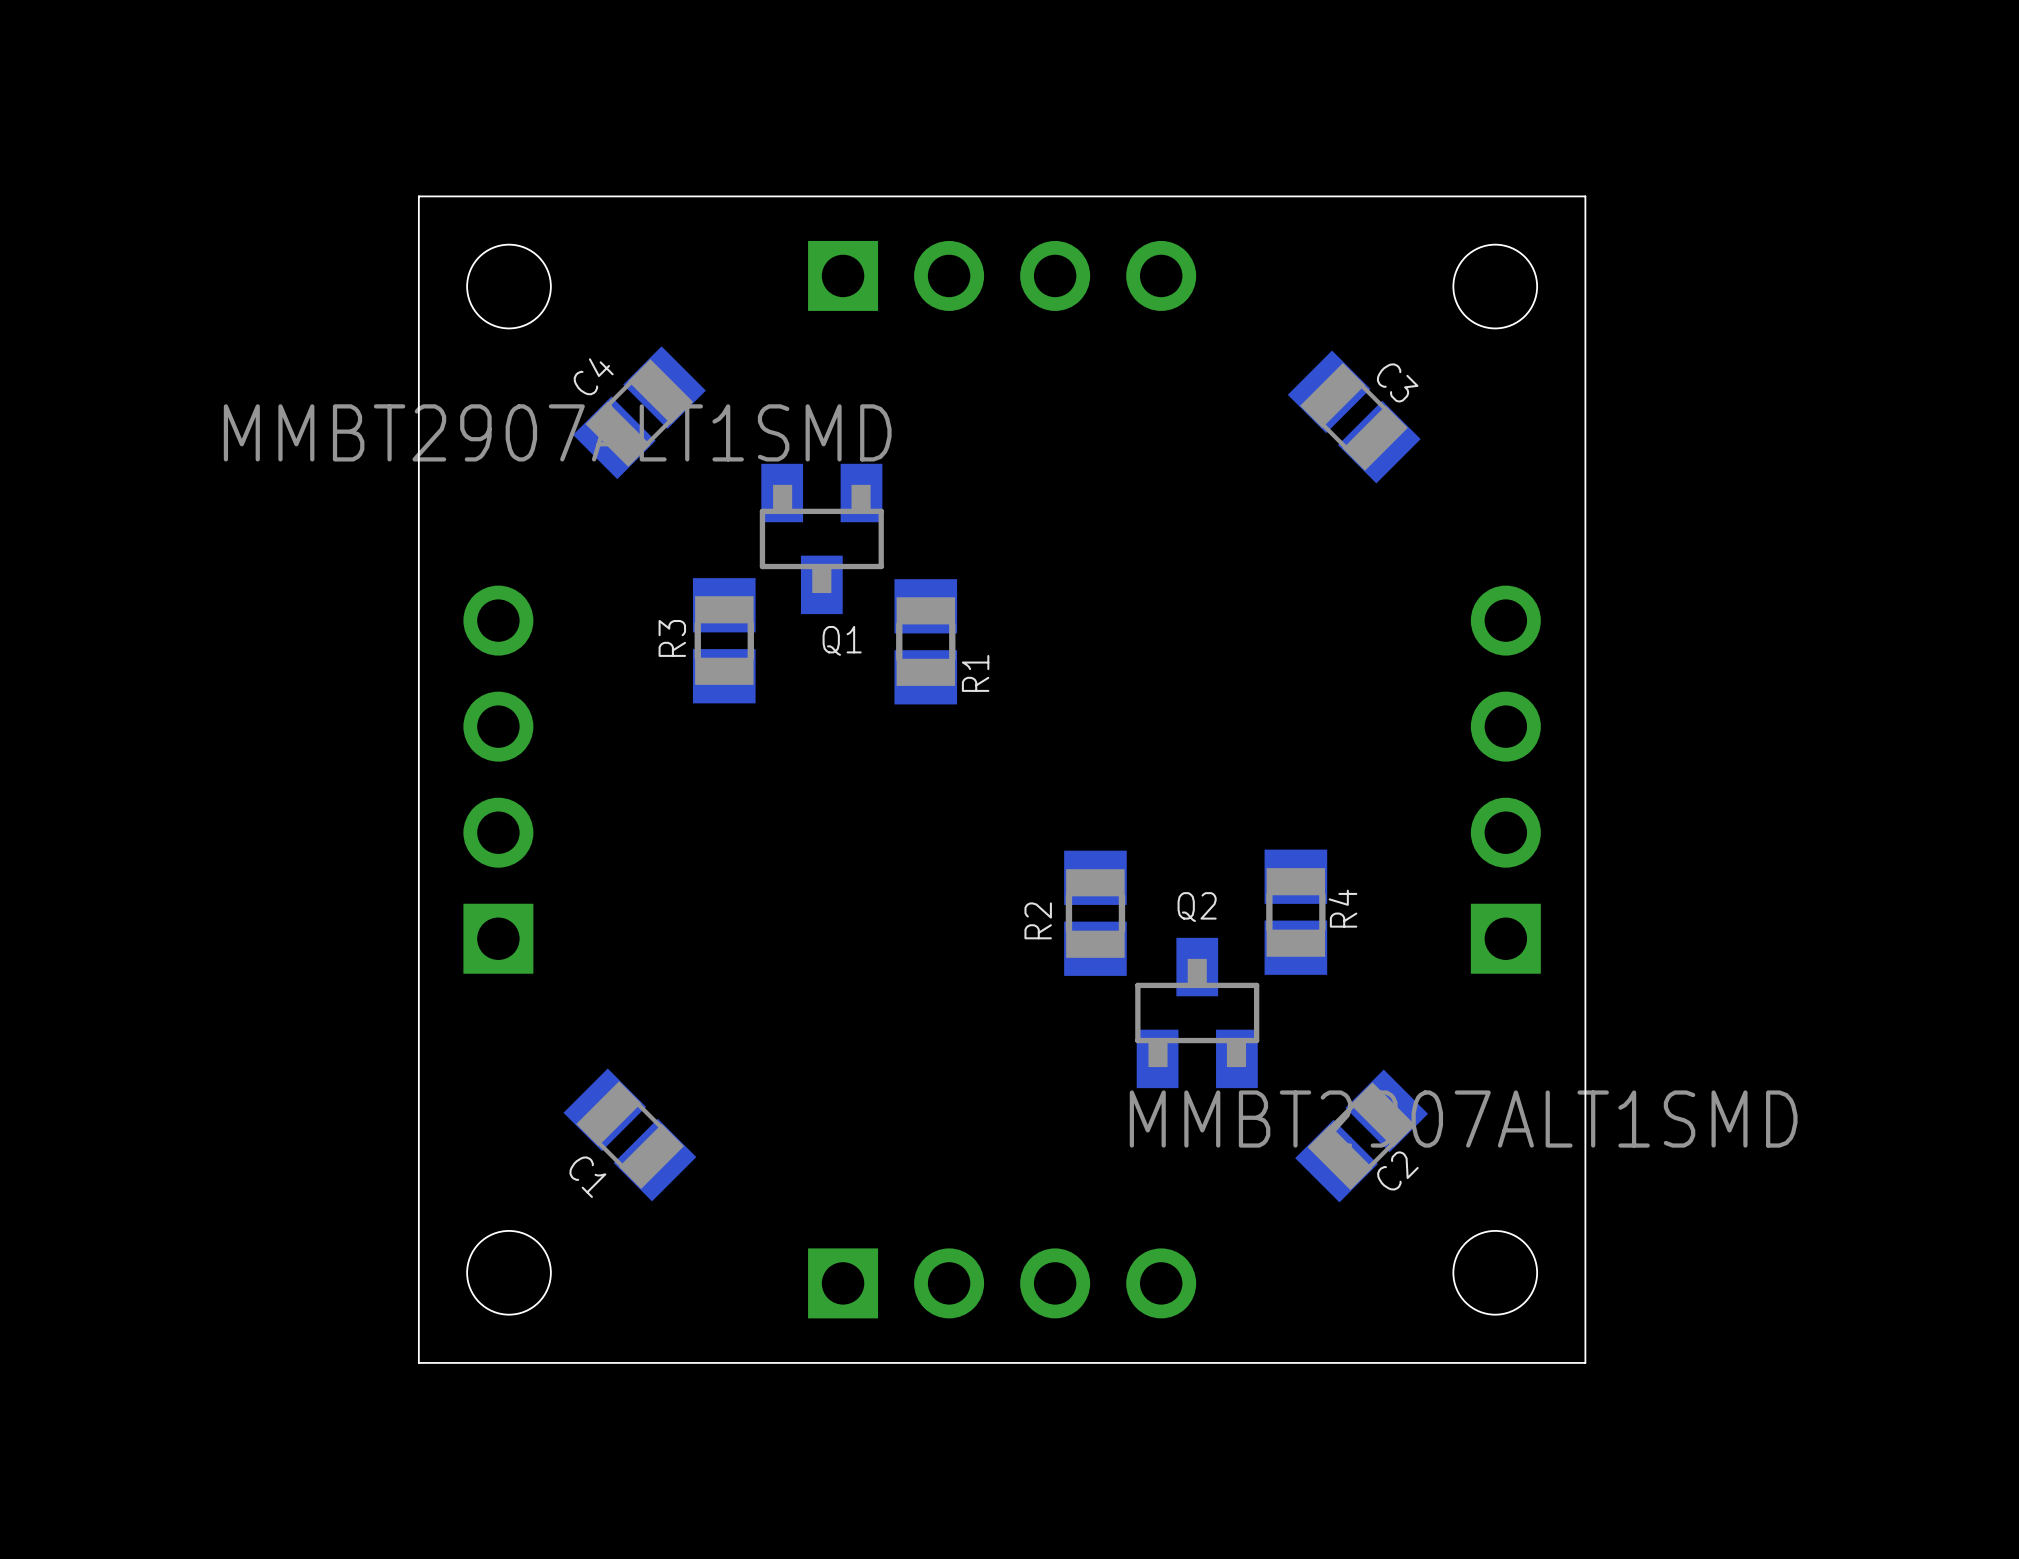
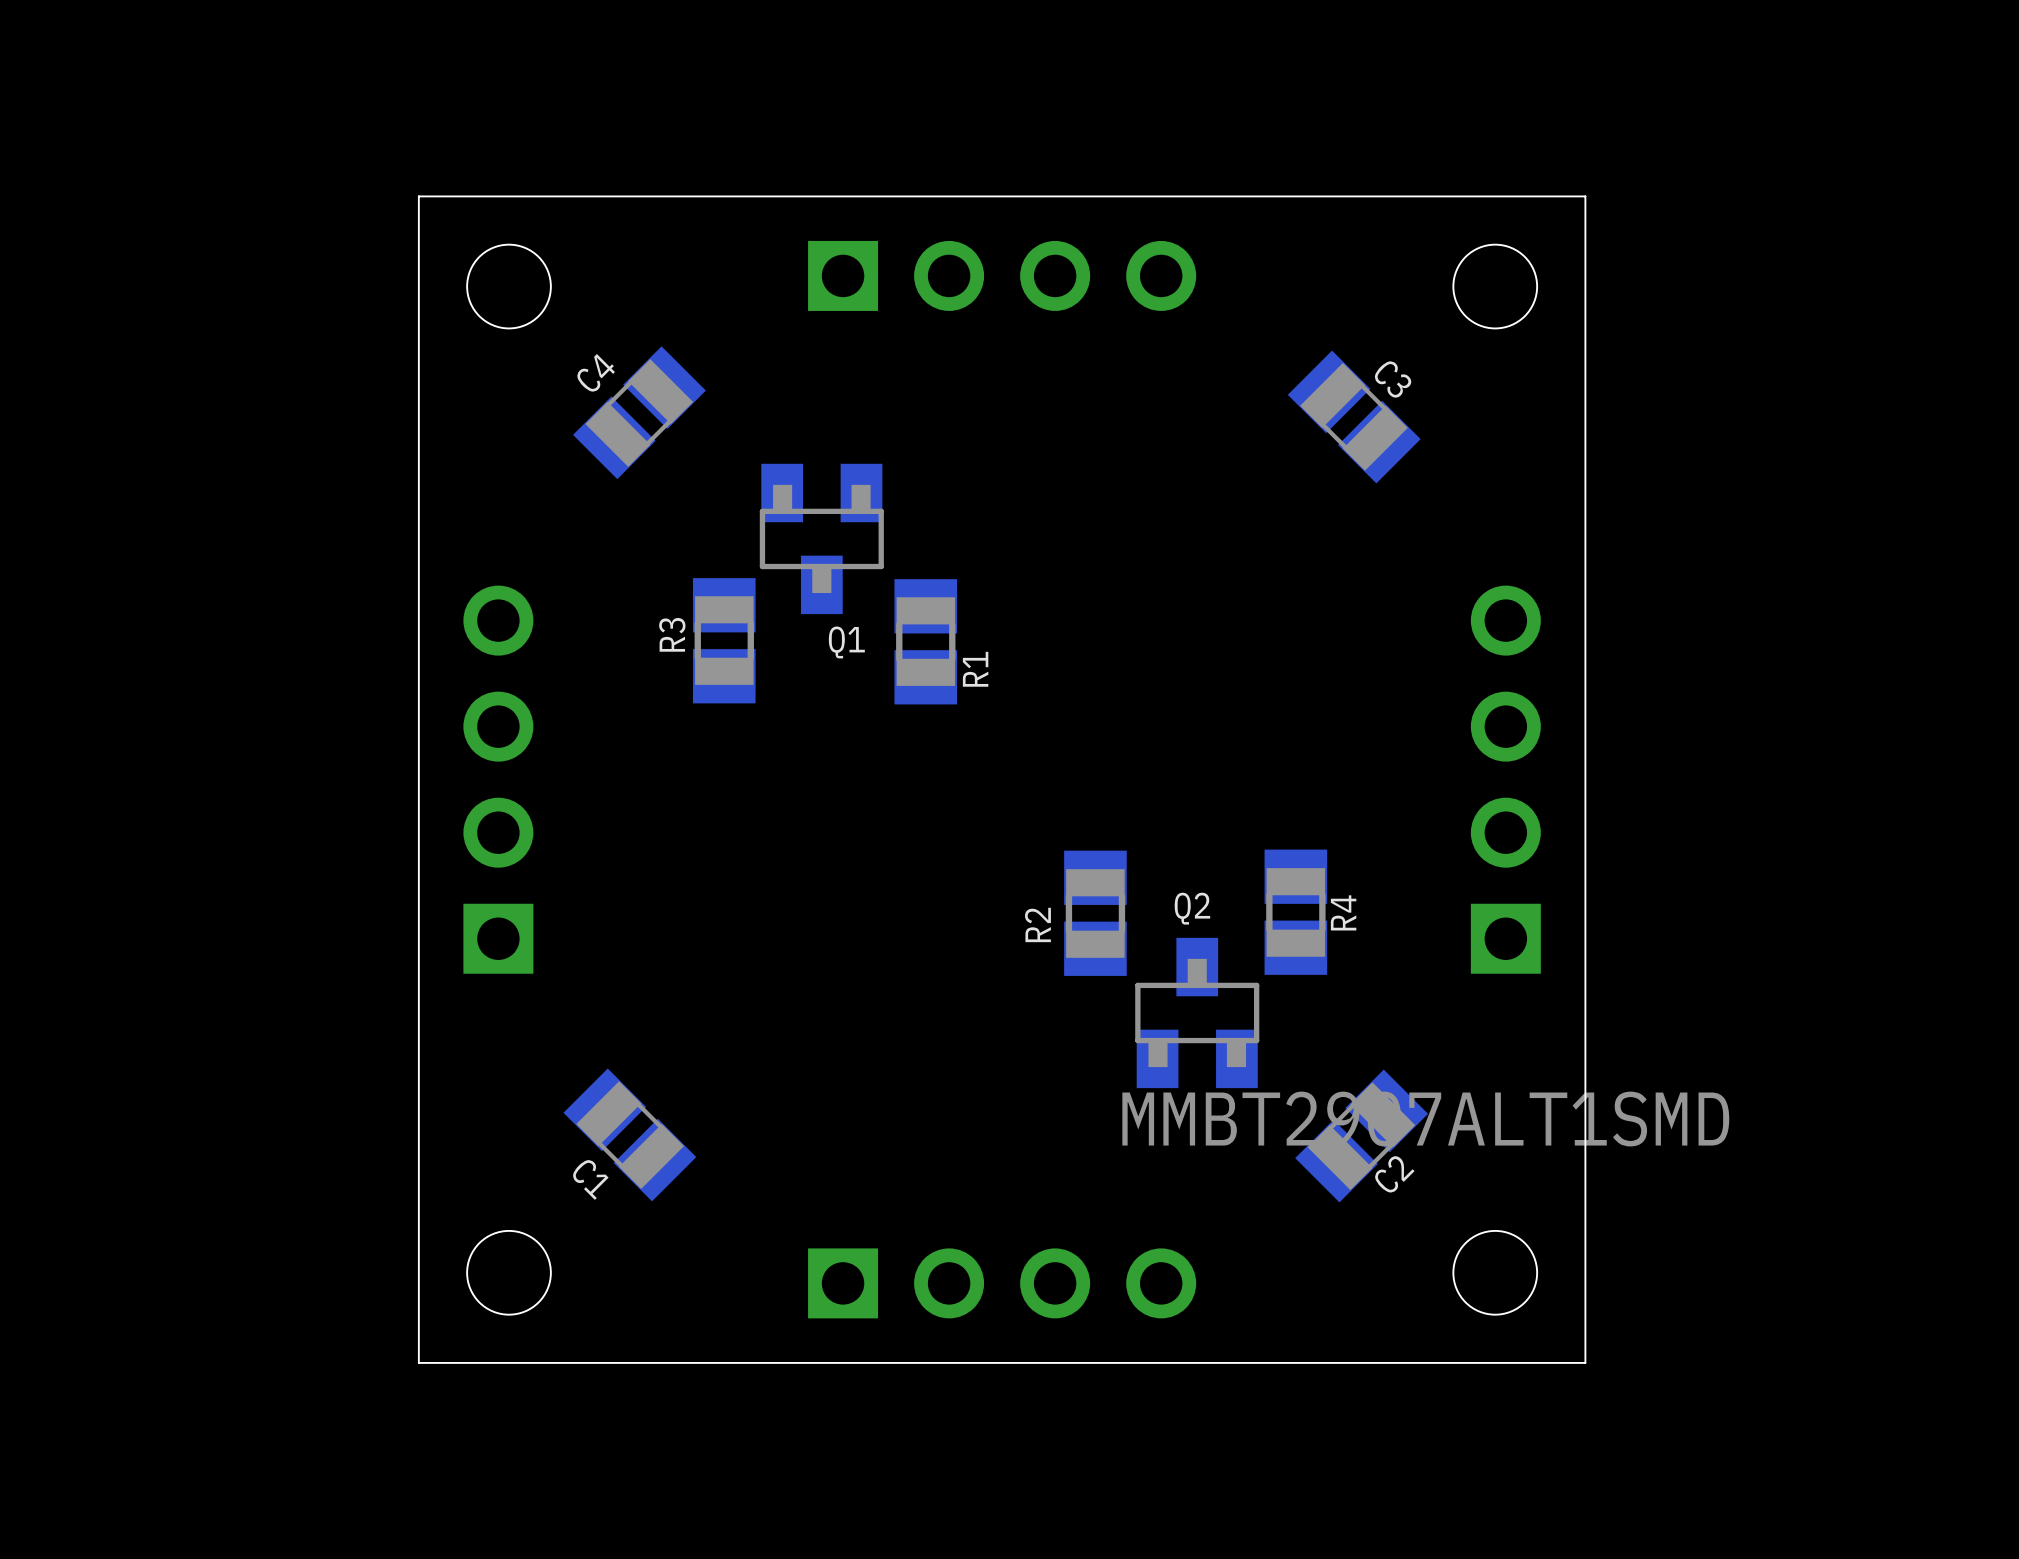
Q1 value: MMBT2907ALT1SMD (557, 432) -> none

